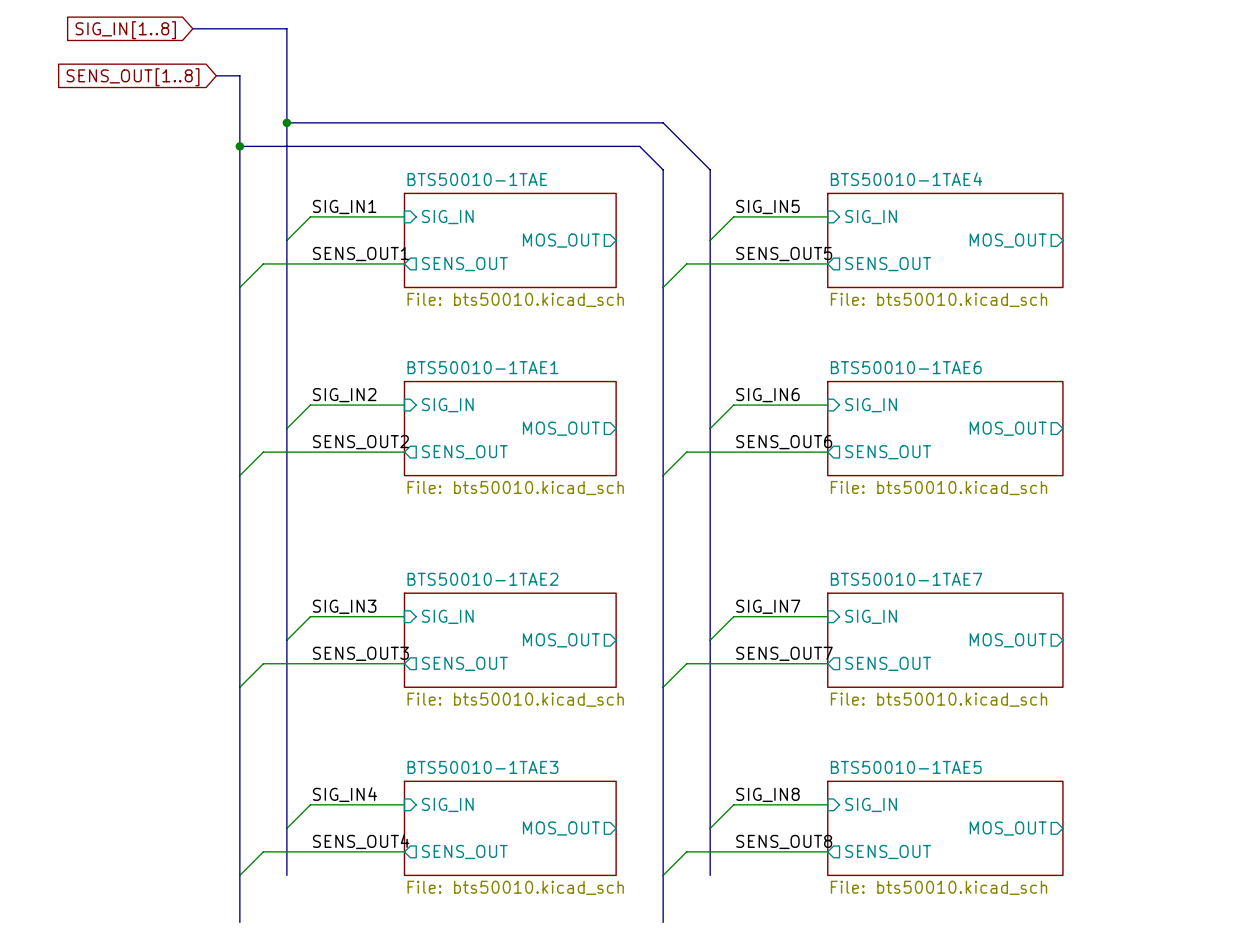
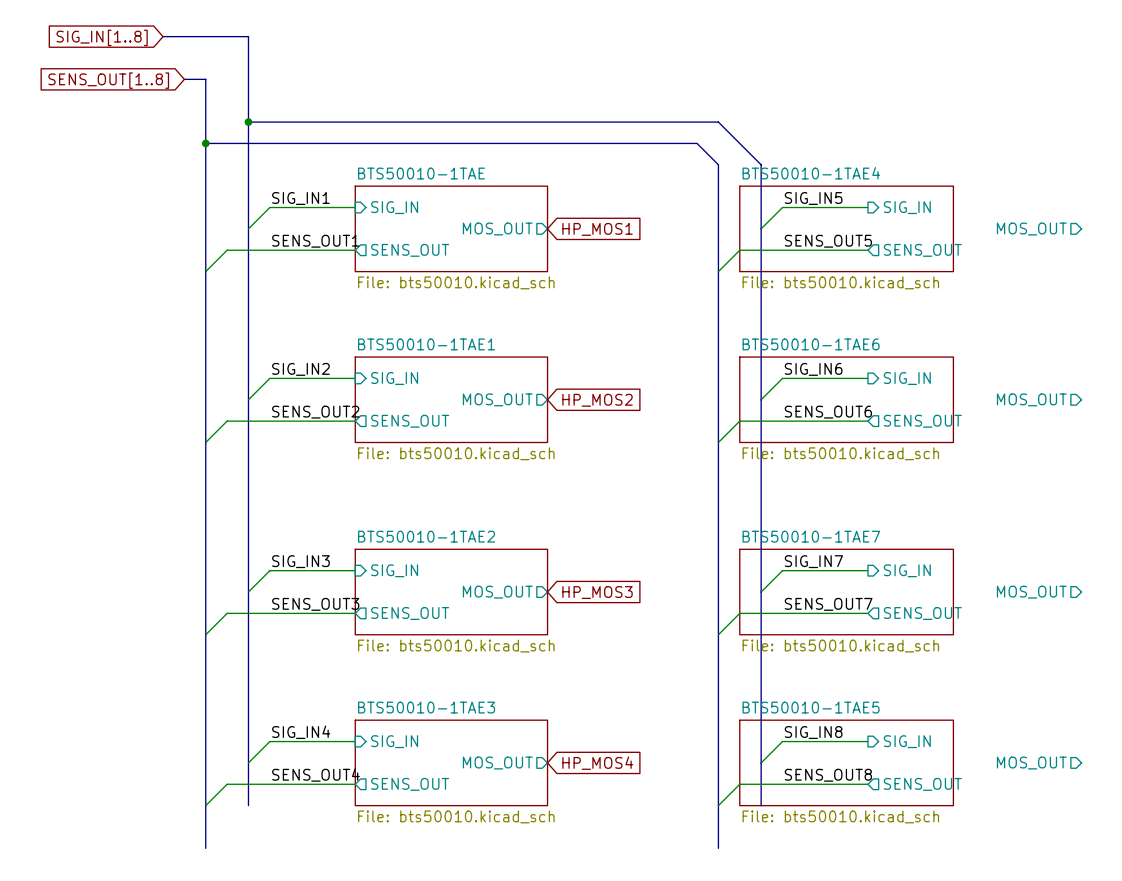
bus: (663, 122) (710, 169) (710, 875) -> (590, 122) (718, 122) (761, 164) (761, 805)
bus: (639, 146) (663, 169) (663, 922) -> (568, 143) (697, 143) (718, 164) (718, 848)
label position: SIG_IN5 (767, 207) -> SIG_IN5 (813, 198)
wire: (827, 216) (733, 216) (710, 240) -> (867, 207) (782, 207) (761, 228)
sheet pin: SIG_IN (871, 217) -> none
sheet pin: none -> SIG_IN (907, 207)
sheet pin: MOS_OUT (1008, 240) -> SENS_OUT (922, 250)
sheet pin: none -> MOS_OUT (1031, 228)
global label: none -> HP_MOS1 (597, 229)
label position: SENS_OUT5 (784, 254) -> SENS_OUT5 (828, 241)
wire: (827, 263) (686, 263) (663, 287) -> (867, 250) (739, 250) (718, 271)
sheet pin: SENS_OUT (888, 264) -> none
label position: SIG_IN6 (767, 395) -> SIG_IN6 (813, 369)
wire: (827, 405) (733, 405) (710, 428) -> (867, 378) (782, 378) (761, 399)
sheet pin: SIG_IN (871, 405) -> none
sheet pin: none -> SIG_IN (907, 378)
sheet pin: MOS_OUT (1008, 428) -> SENS_OUT (922, 421)
sheet pin: none -> MOS_OUT (1031, 399)
global label: none -> HP_MOS2 (597, 400)
label position: SENS_OUT6 (784, 442) -> SENS_OUT6 (828, 412)
wire: (827, 452) (686, 452) (663, 475) -> (867, 421) (739, 421) (718, 442)
sheet pin: SENS_OUT (888, 452) -> none
label position: SIG_IN7 (768, 606) -> SIG_IN7 (813, 561)
wire: (827, 616) (733, 616) (710, 640) -> (867, 570) (782, 570) (761, 592)
sheet pin: SIG_IN (871, 616) -> none
sheet pin: none -> SIG_IN (907, 570)
global label: none -> HP_MOS3 (597, 592)
sheet pin: MOS_OUT (1008, 640) -> SENS_OUT (922, 613)
sheet pin: none -> MOS_OUT (1031, 592)
label position: SENS_OUT7 (784, 653) -> SENS_OUT7 (828, 604)
wire: (827, 663) (686, 663) (663, 687) -> (867, 613) (739, 613) (718, 634)
sheet pin: SENS_OUT (888, 663) -> none
label position: SIG_IN8 (767, 794) -> SIG_IN8 (813, 732)
wire: (827, 804) (733, 804) (710, 828) -> (867, 741) (782, 741) (761, 762)
sheet pin: SIG_IN (871, 804) -> none
sheet pin: none -> SIG_IN (907, 741)
global label: none -> HP_MOS4 (597, 763)
sheet pin: MOS_OUT (1008, 828) -> SENS_OUT (922, 784)
sheet pin: none -> MOS_OUT (1031, 763)
label position: SENS_OUT8 (784, 841) -> SENS_OUT8 (828, 775)
wire: (827, 851) (686, 851) (663, 875) -> (867, 784) (739, 784) (718, 805)
sheet pin: SENS_OUT (888, 851) -> none

